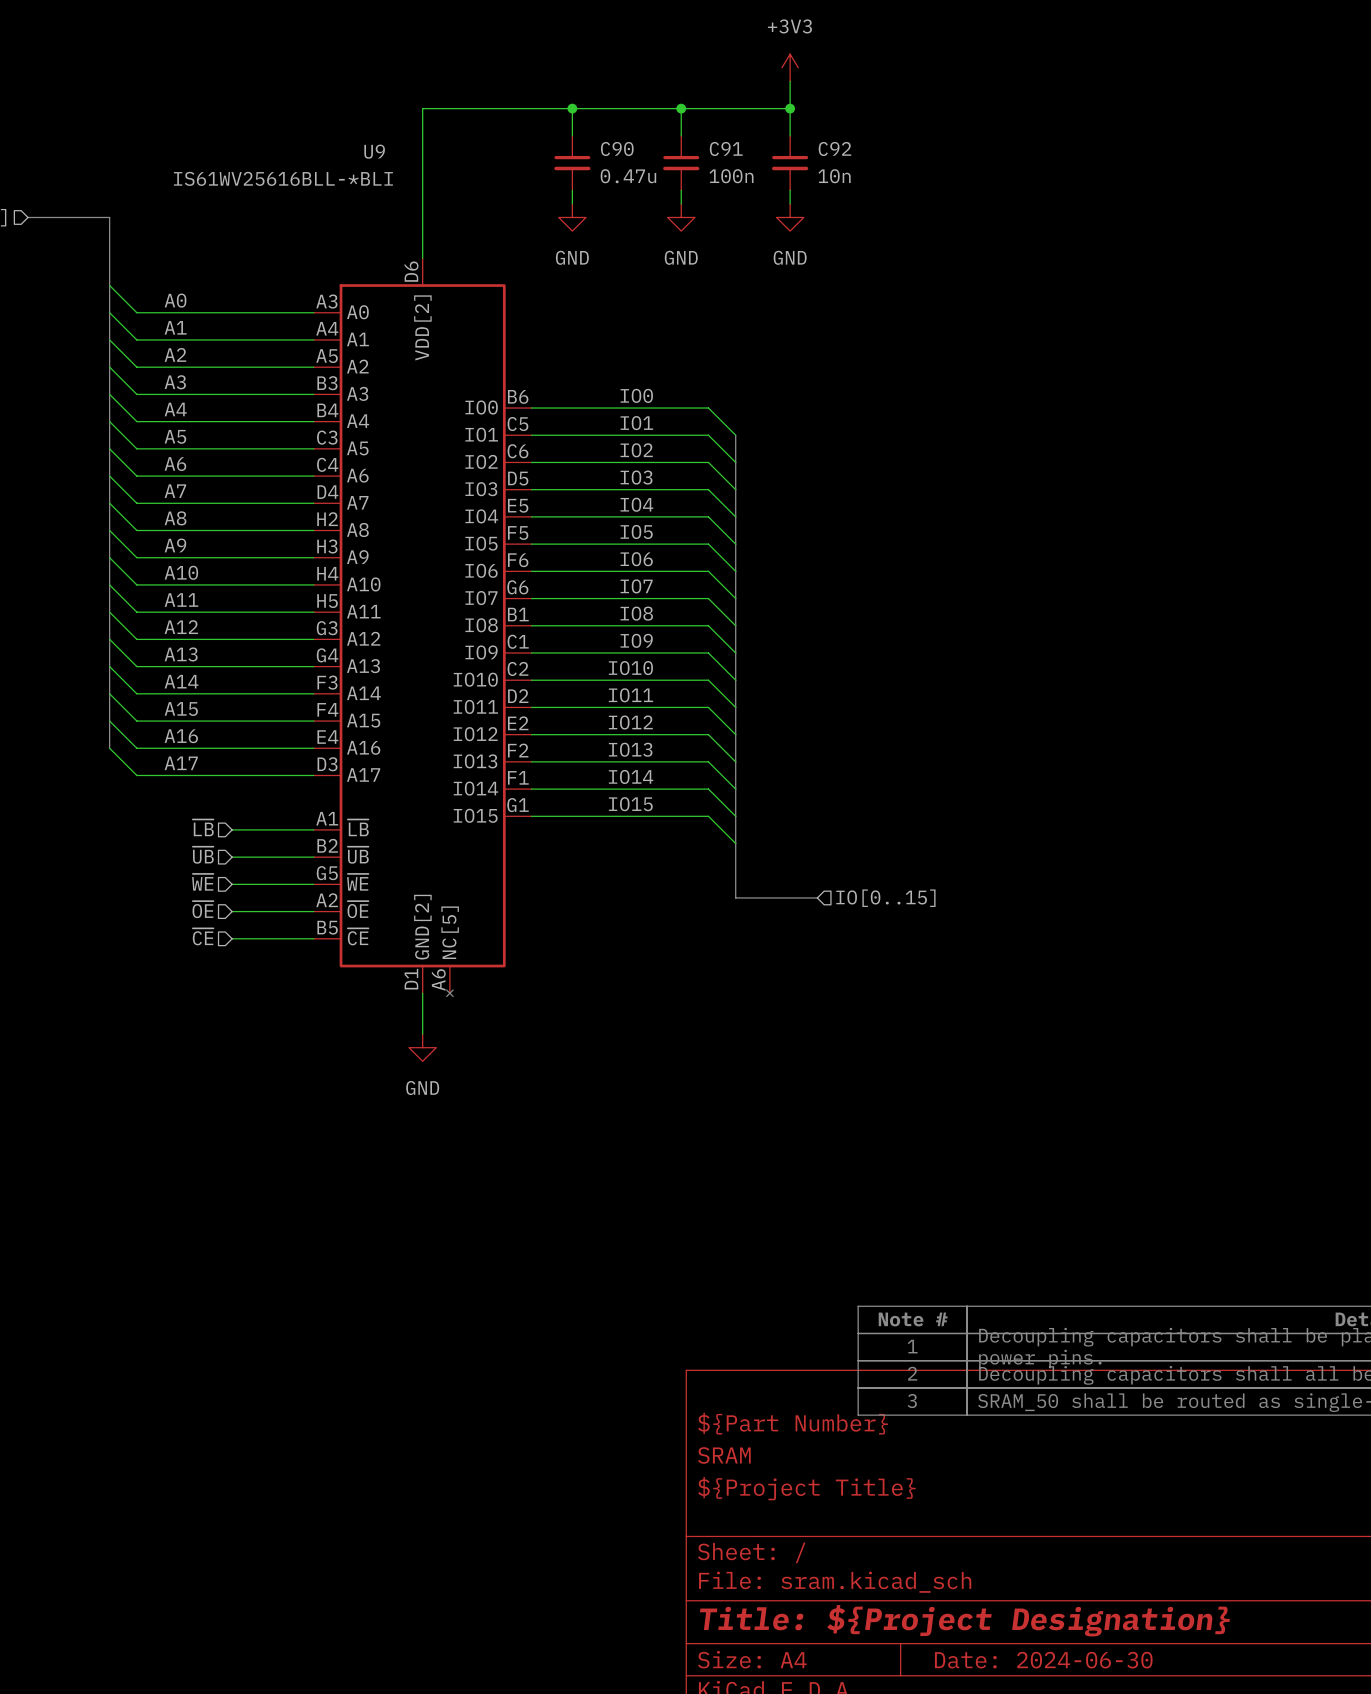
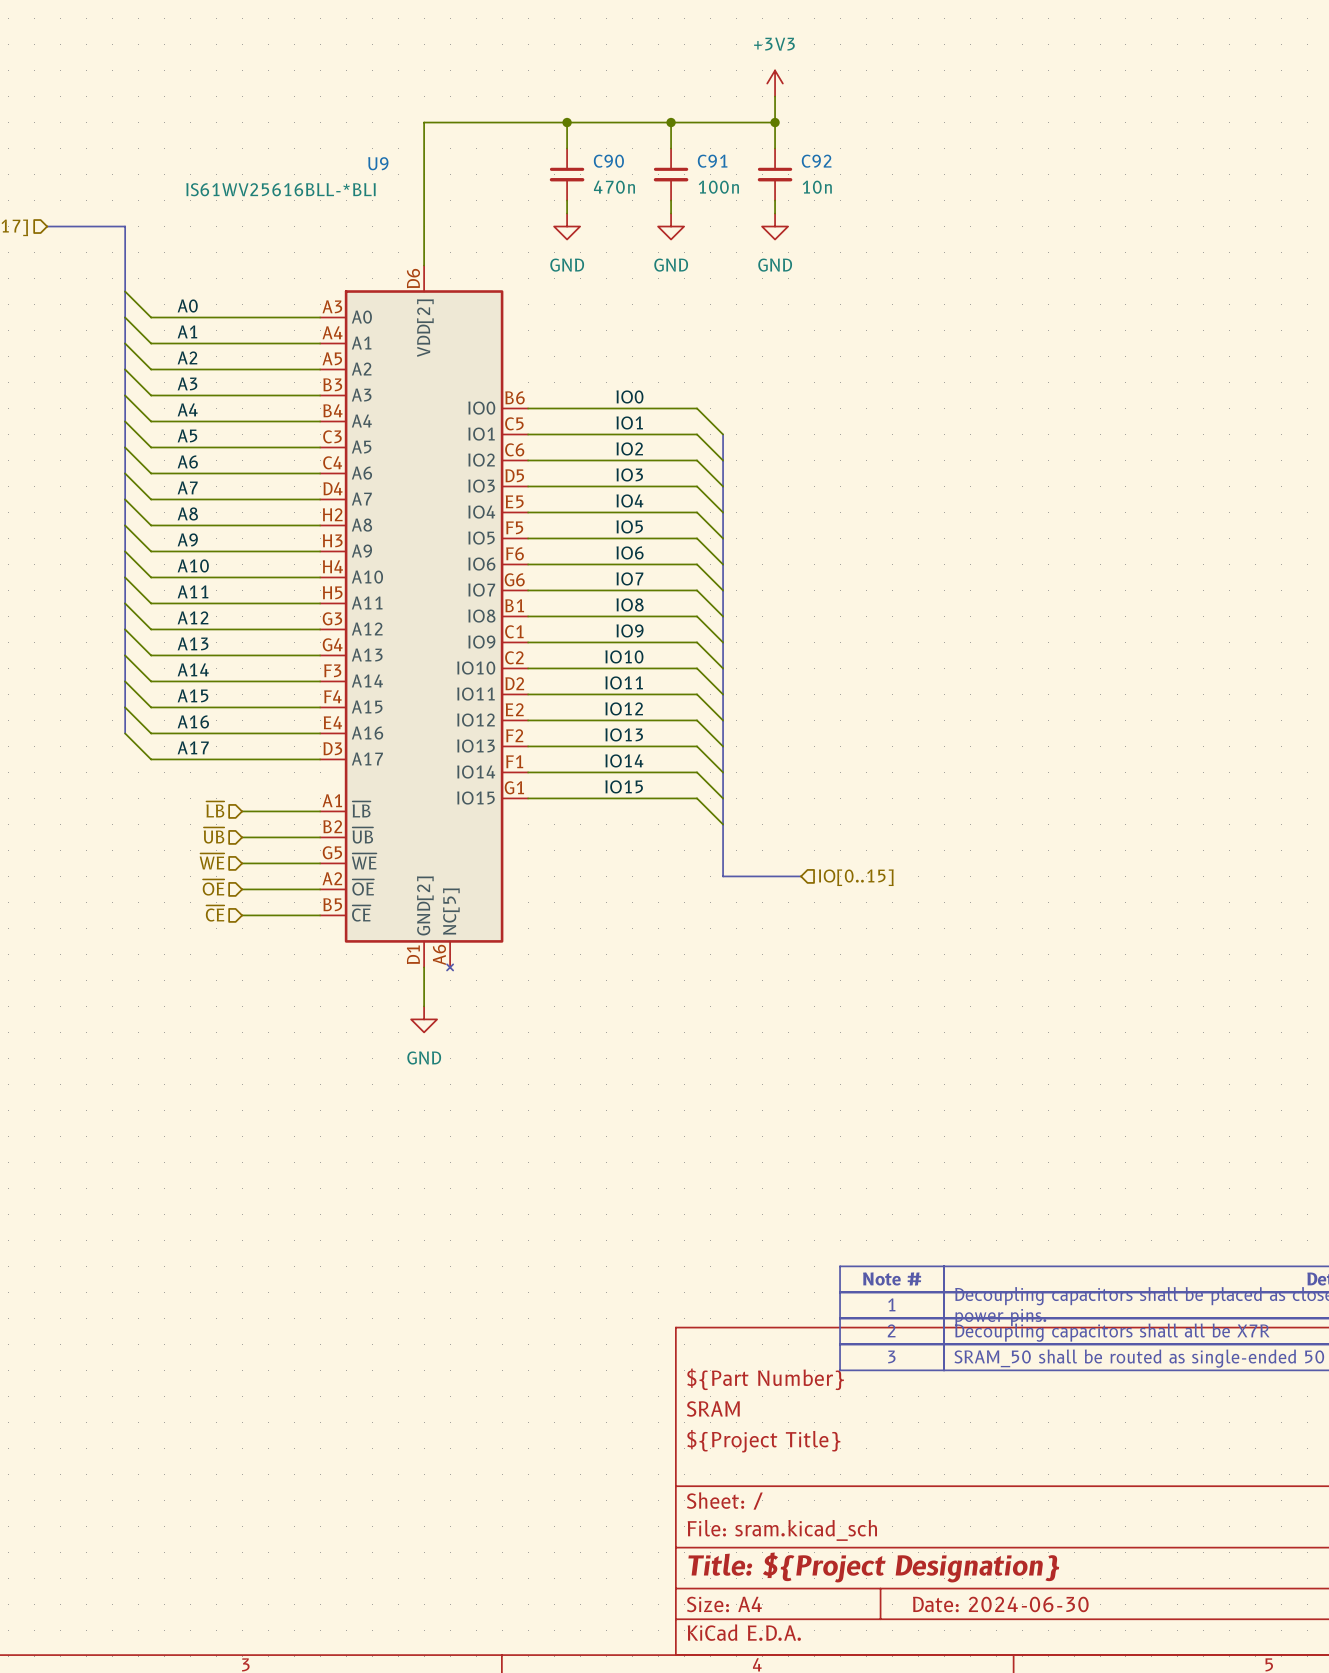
C90 value: 0.47u (628, 176) -> 470n (614, 187)

